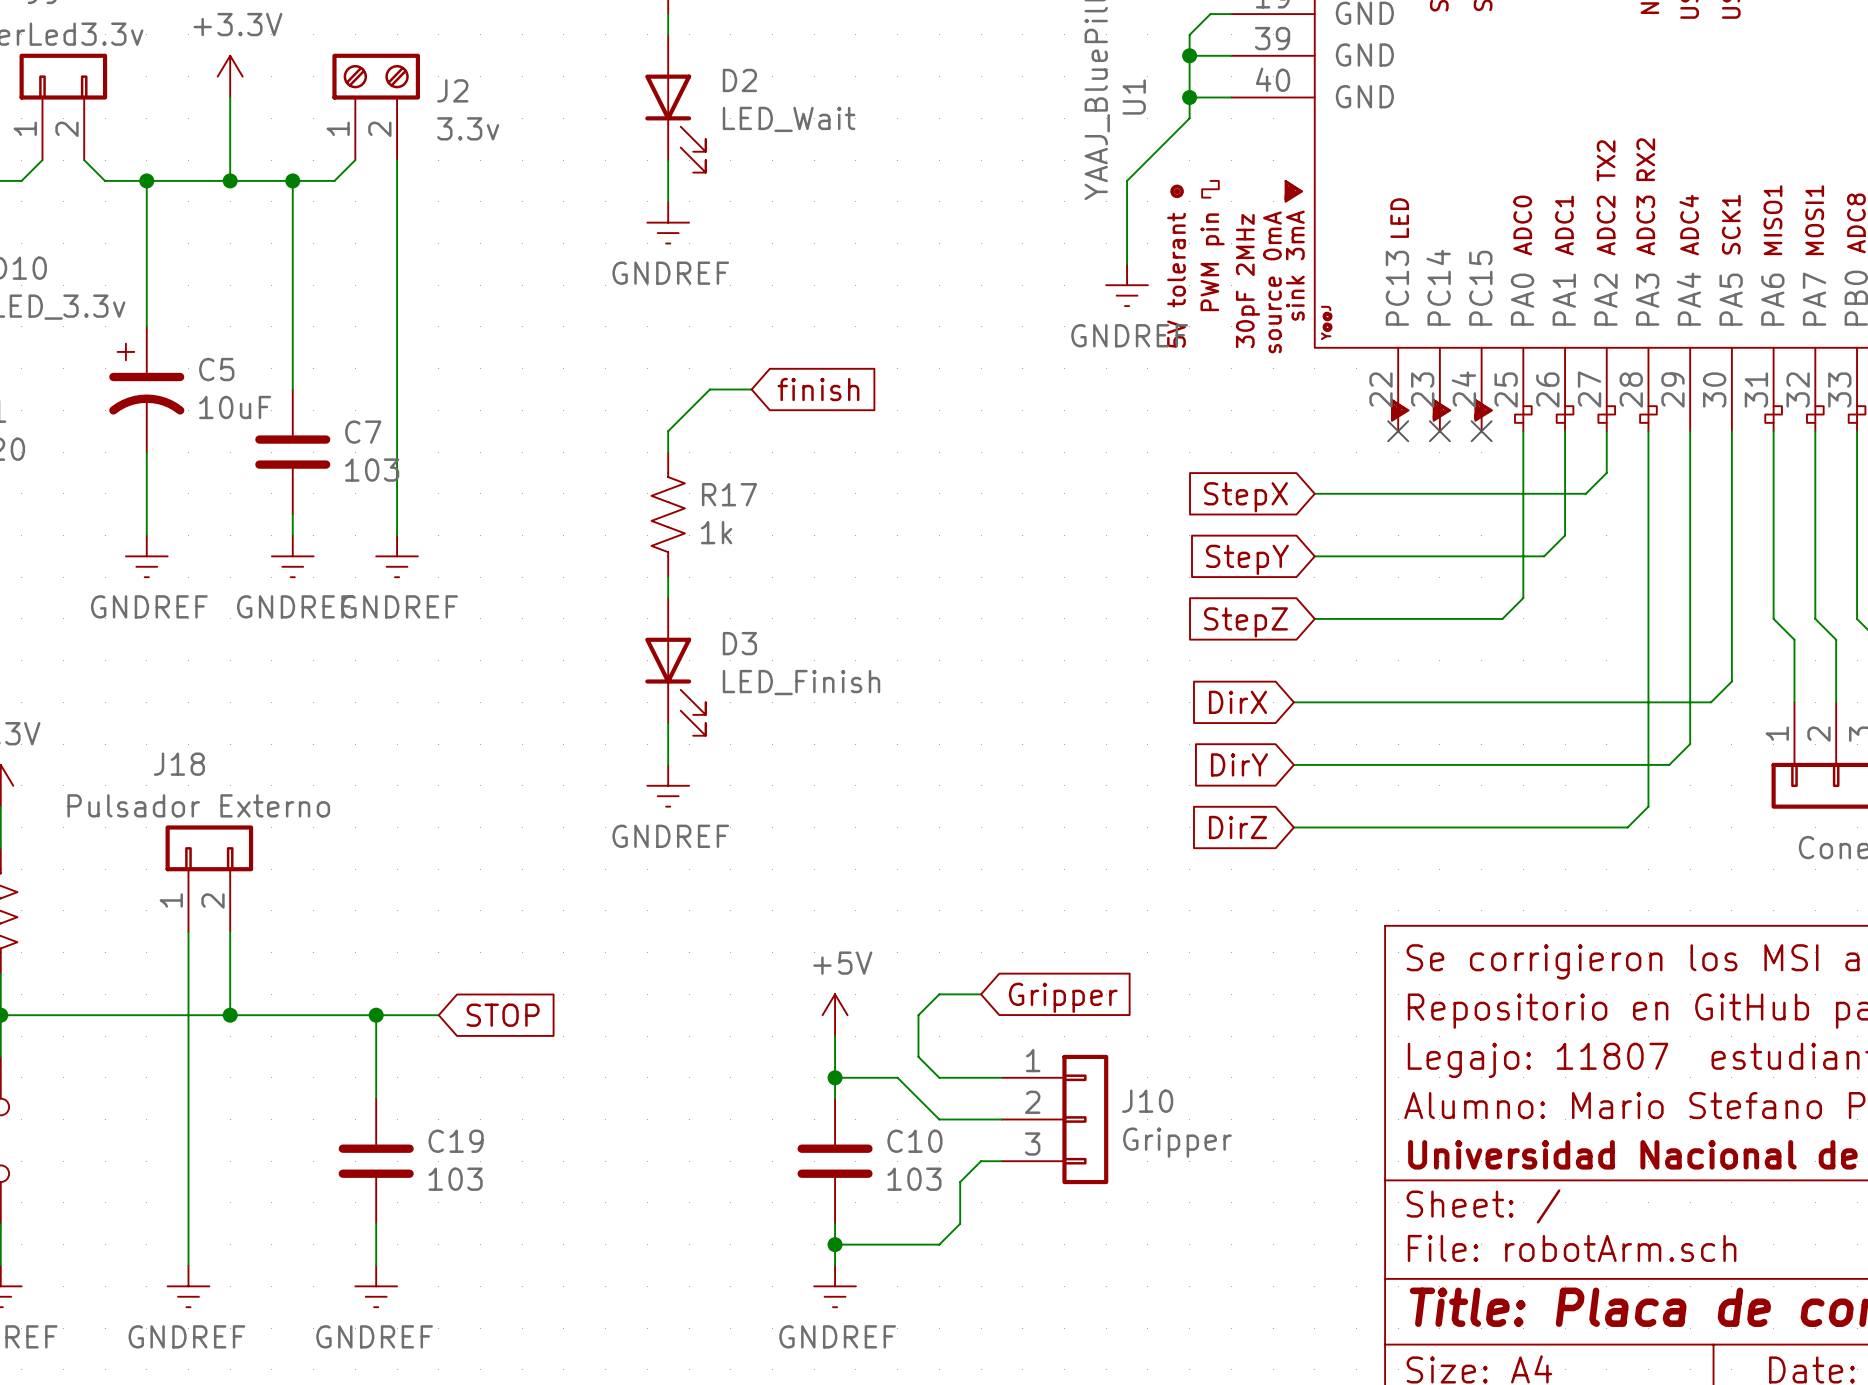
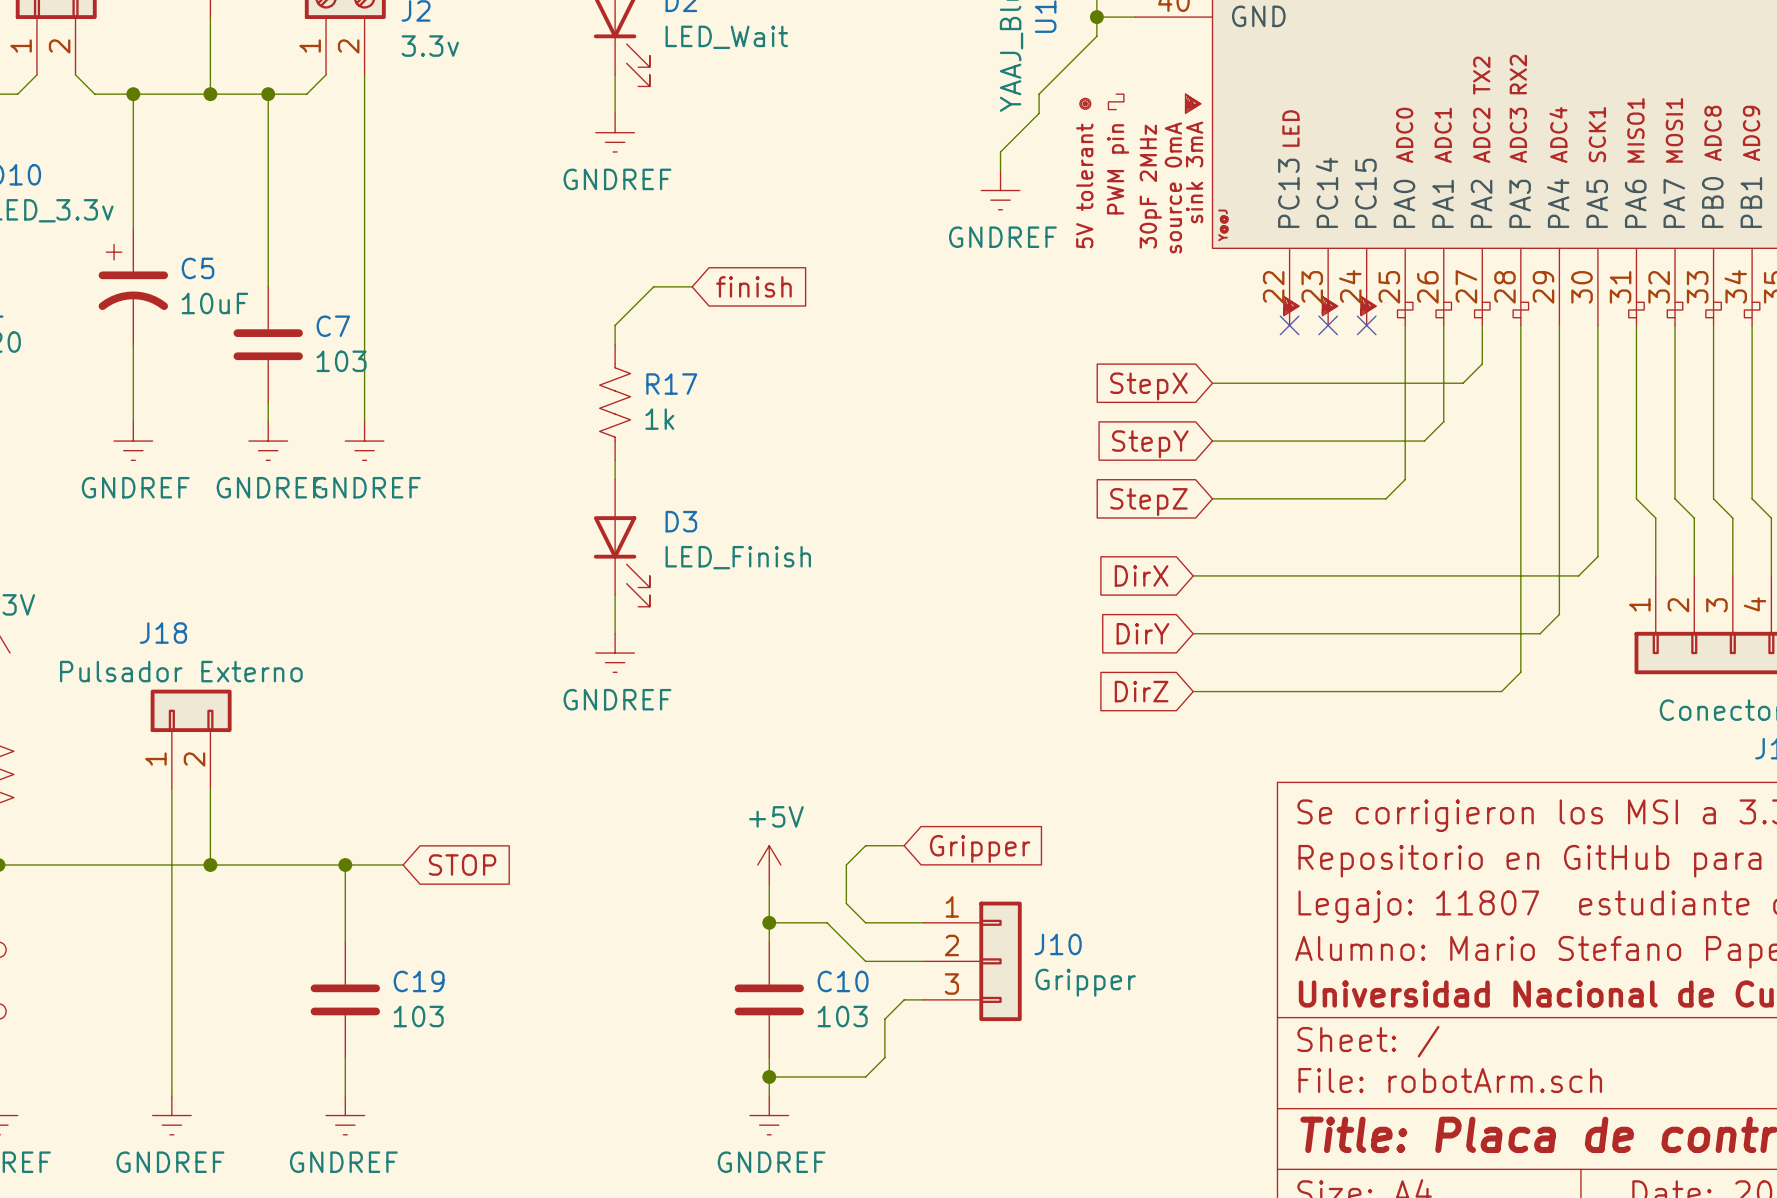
wire: (1127, 201) (1127, 264) -> (1039, 113) (1000, 151) (1000, 171)
power symbol position: GNDREF (1127, 285) -> GNDREF (1000, 190)

